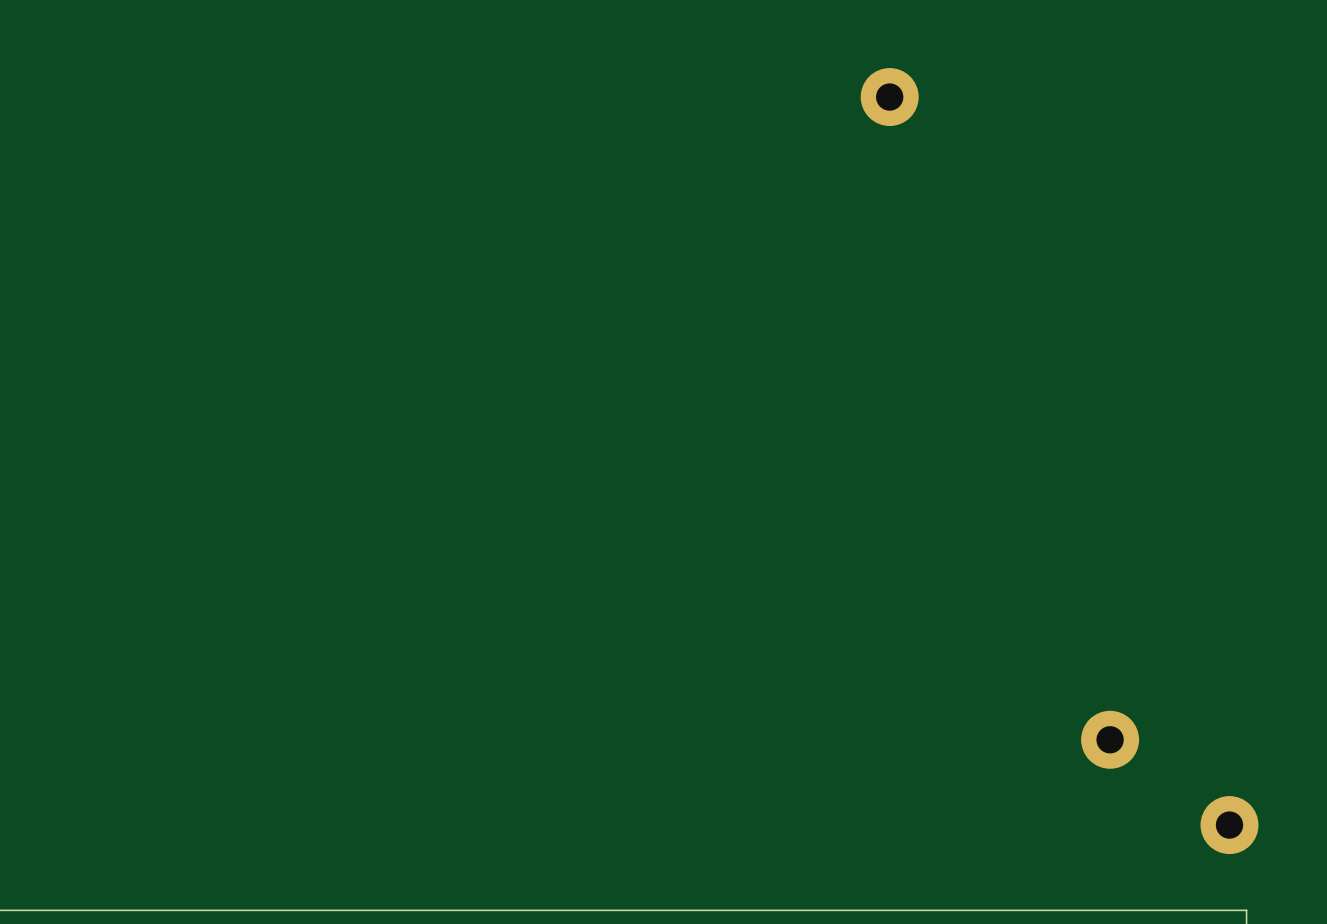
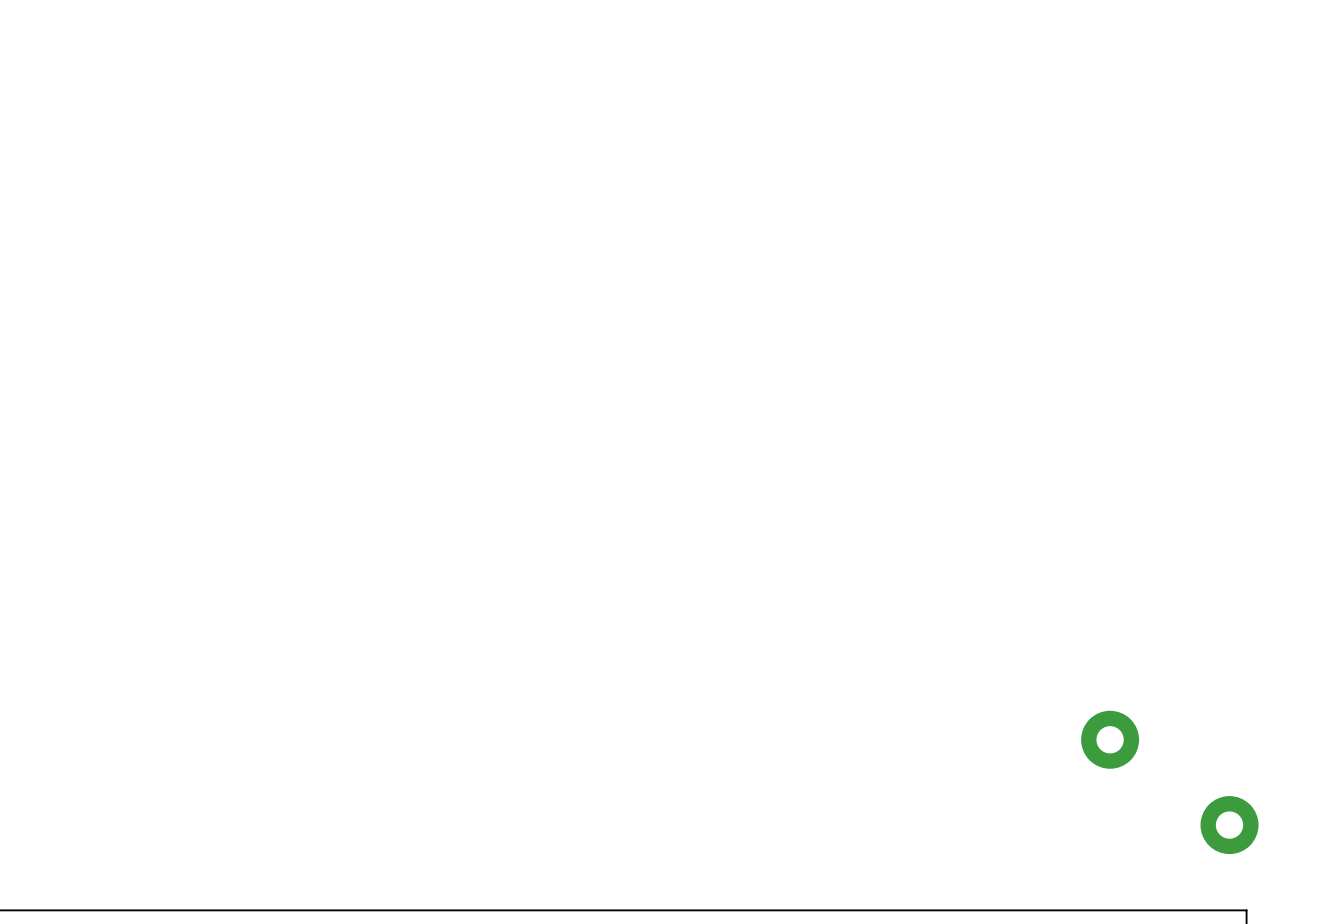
part: (889, 97) -> none

